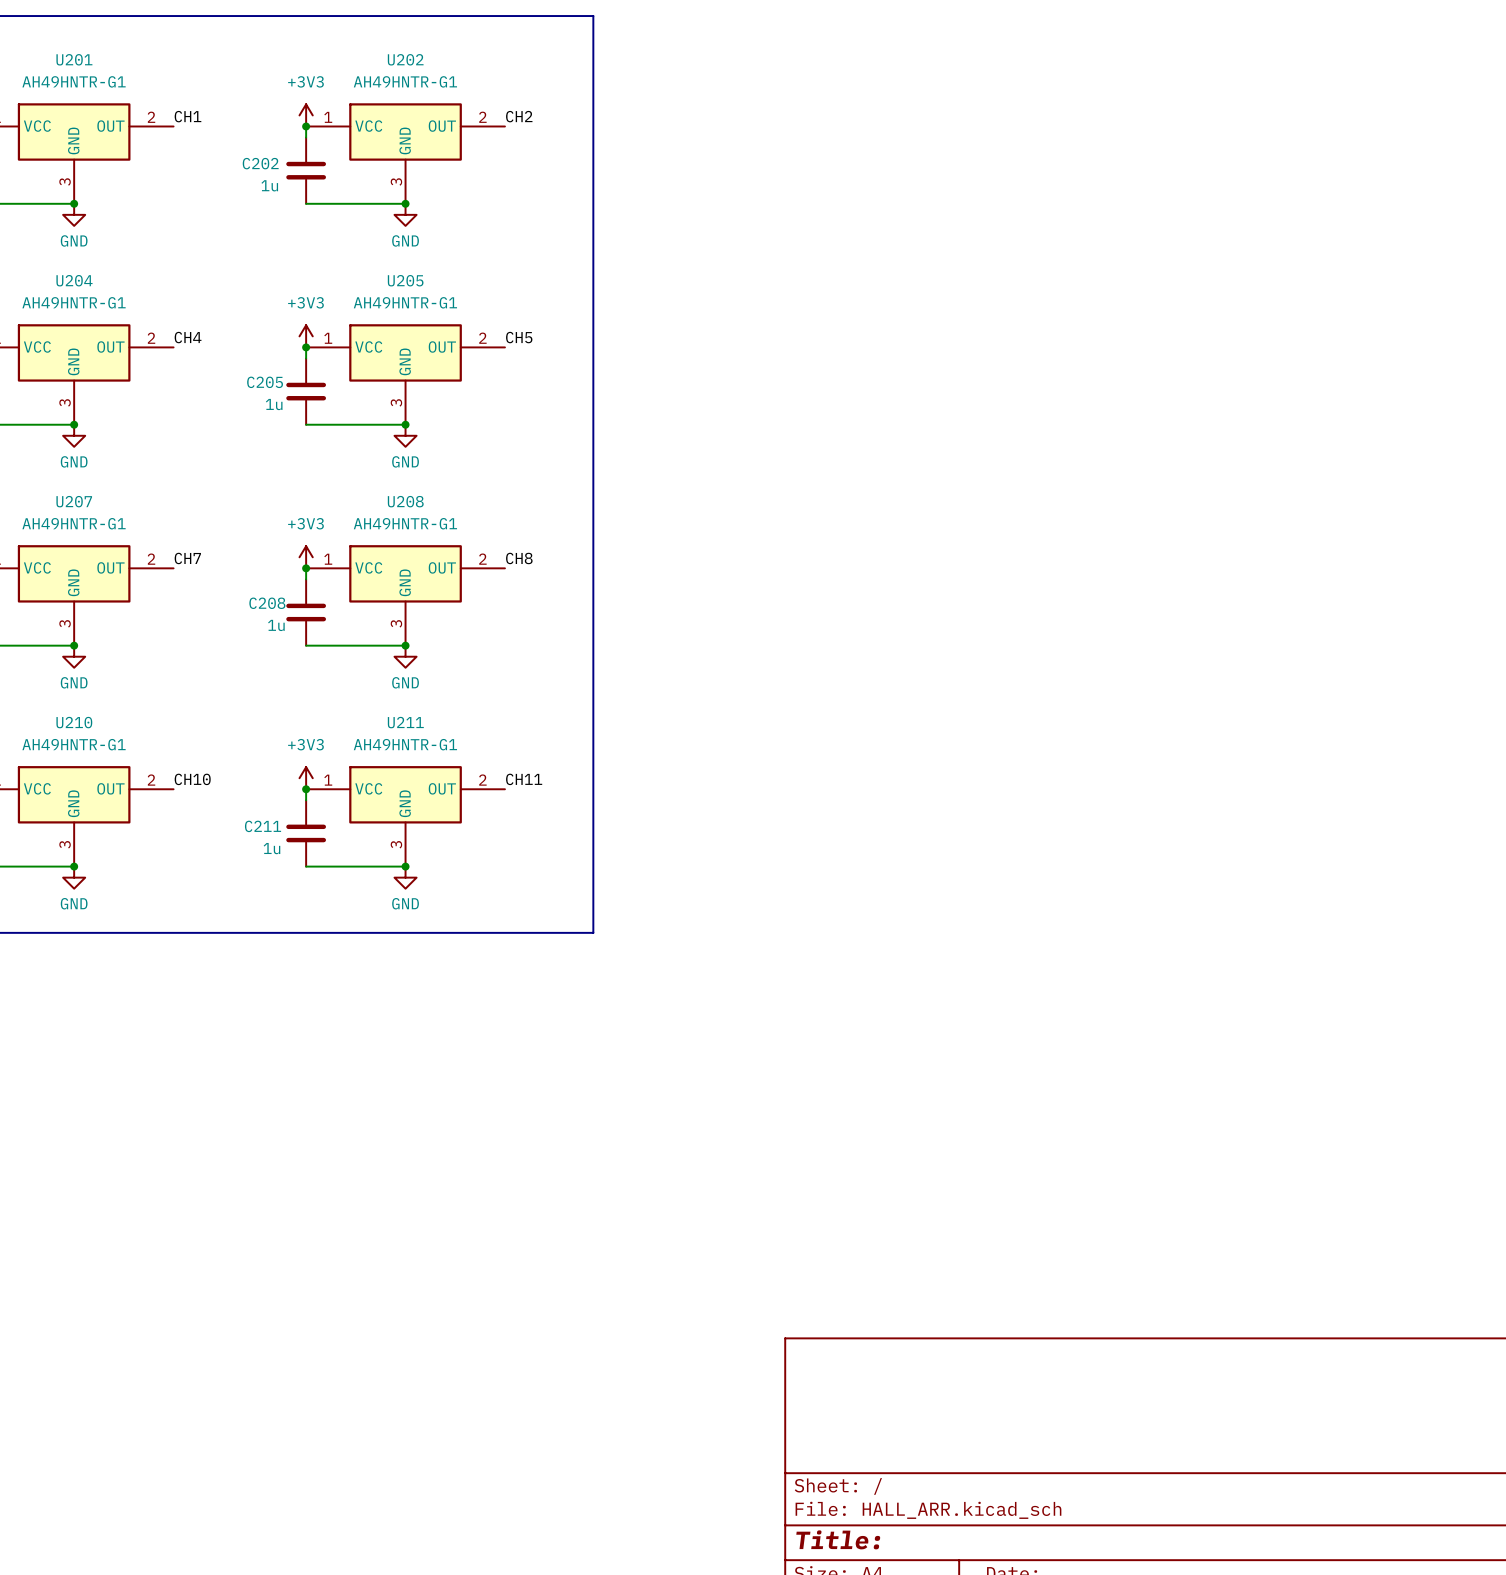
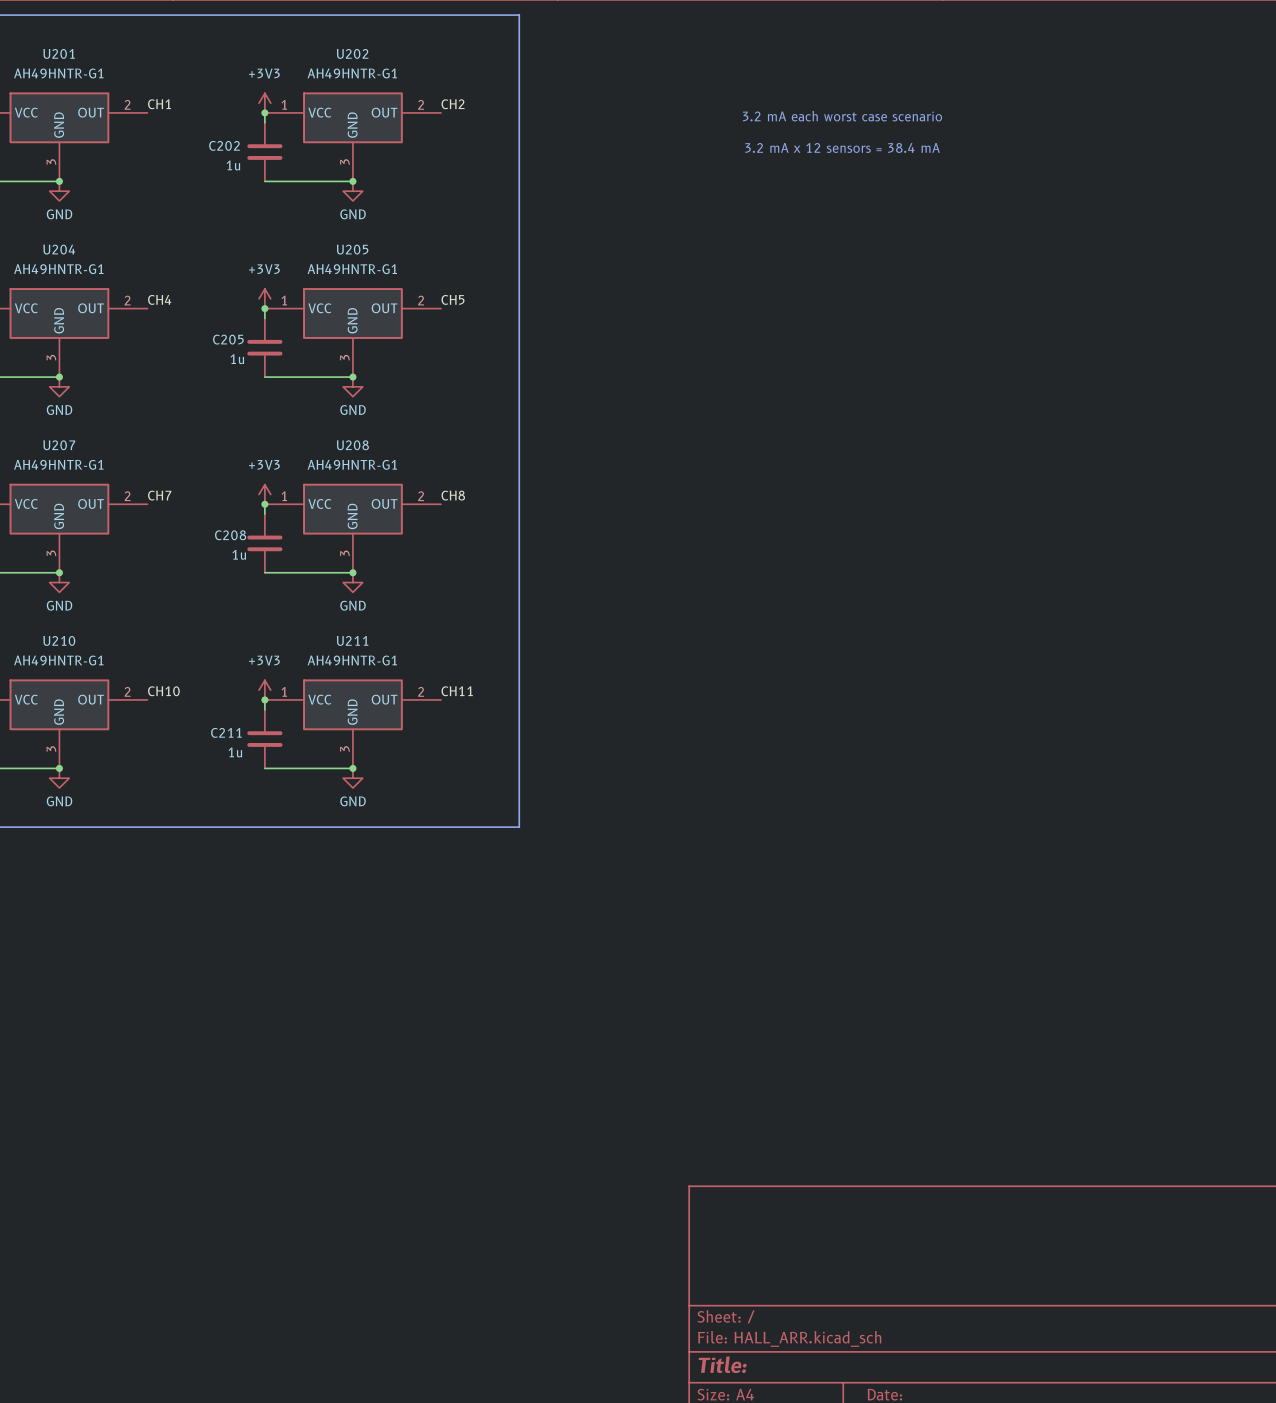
text: none -> 3.2 mA each worst case scenario (842, 116)
text: none -> 3.2 mA x 12 sensors = 38.4 mA (842, 147)

